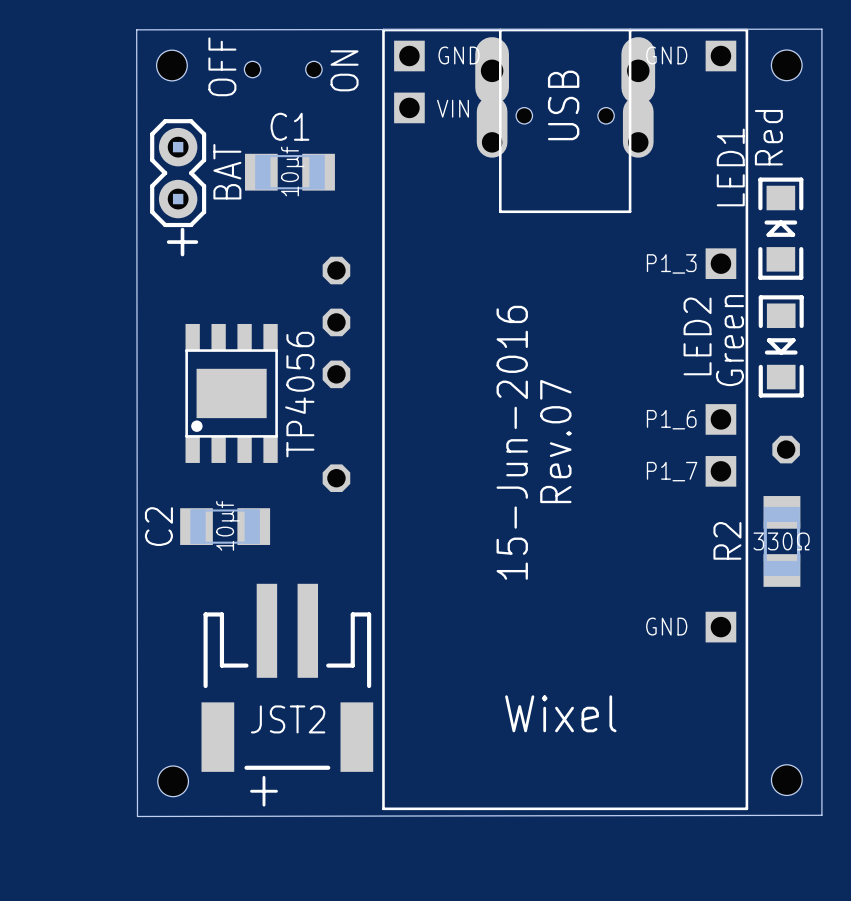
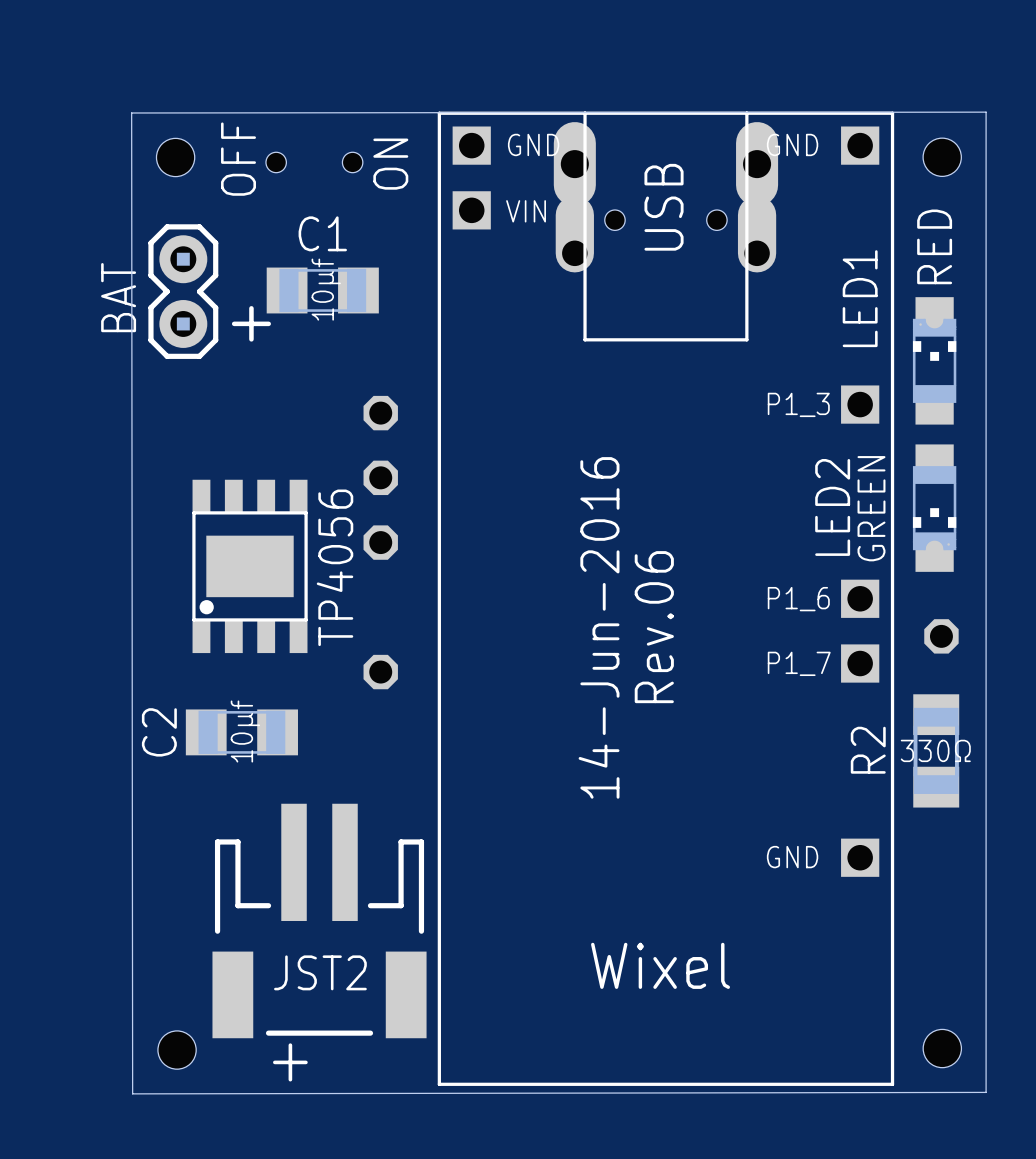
LED1 value: Red (768, 137) -> RED (934, 246)
part value position: BAT (227, 171) -> BAT (118, 297)
LED1 footprint: [758, 177, 804, 280] -> [912, 297, 957, 425]
part name position: + (182, 242) -> + (251, 323)
LED2 footprint: [758, 295, 804, 398] -> [912, 444, 957, 572]
LED2 value: Green (729, 340) -> GREEN (871, 508)
text: Rev.07 (555, 441) -> Rev.06 (654, 627)
text: 15-Jun-2016 (512, 442) -> 14-Jun-2016 (599, 627)

